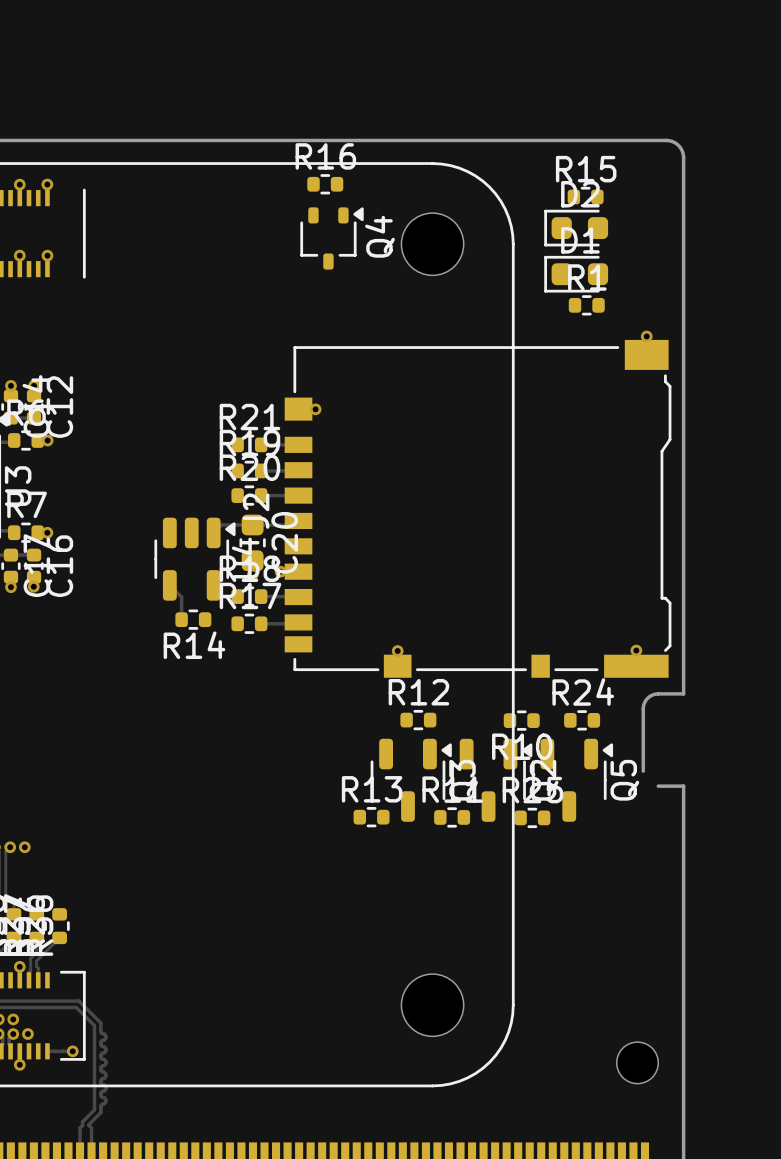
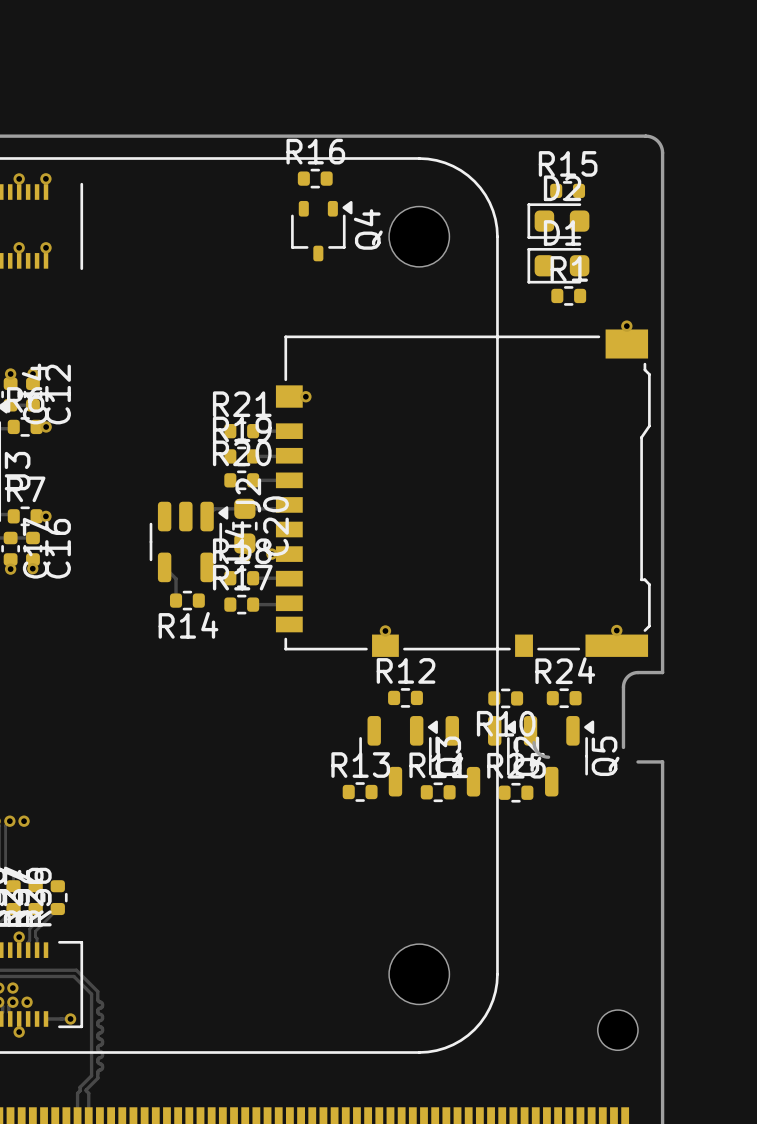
board edge: none -> (534, 742) (538, 752) (548, 757)

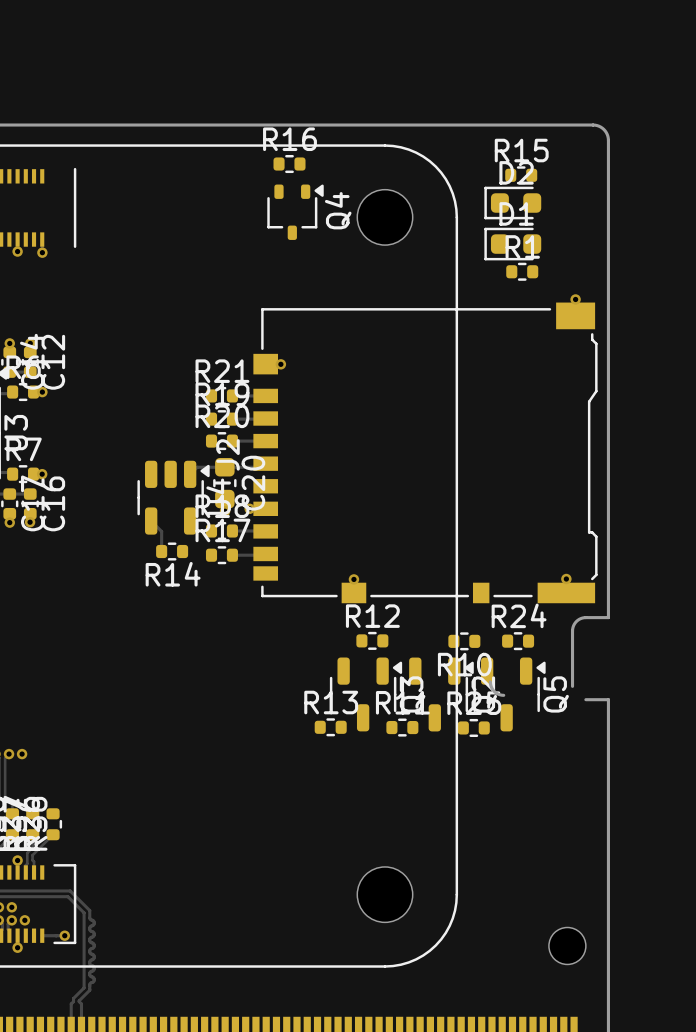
via: (19, 178) -> none
via: (45, 178) -> none
via: (19, 247) -> none
via: (46, 247) -> none
via: none -> (17, 251)
via: none -> (42, 252)

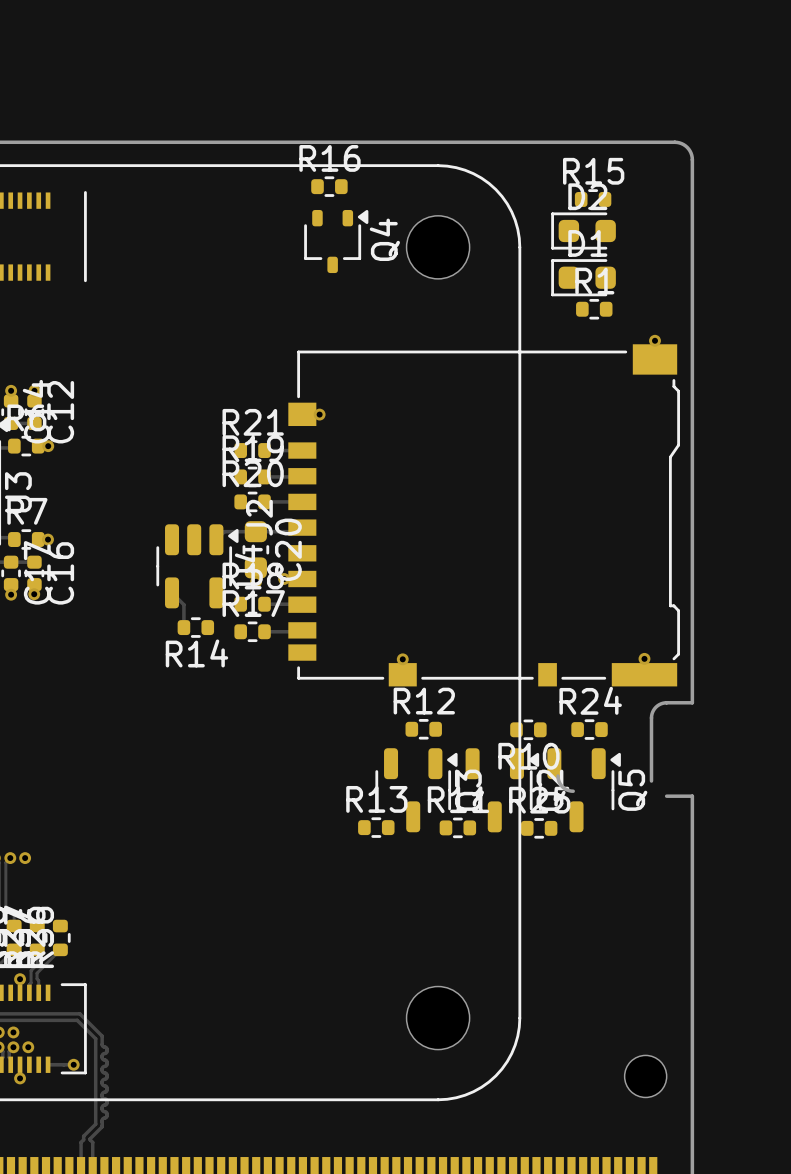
via: (17, 251) -> none
via: (42, 252) -> none

